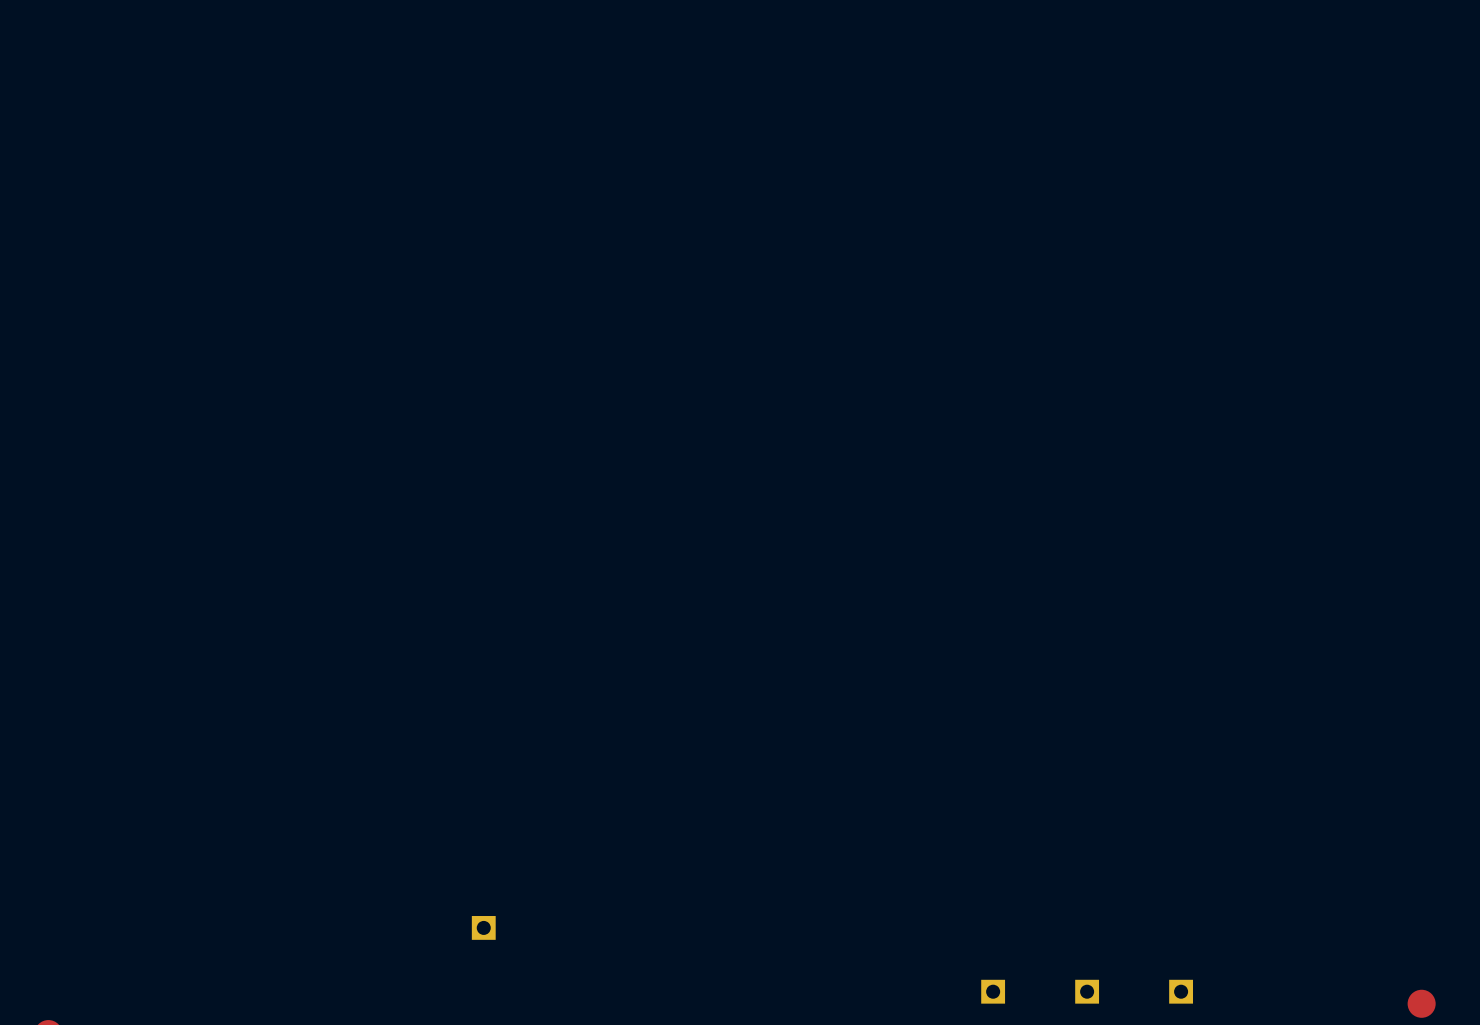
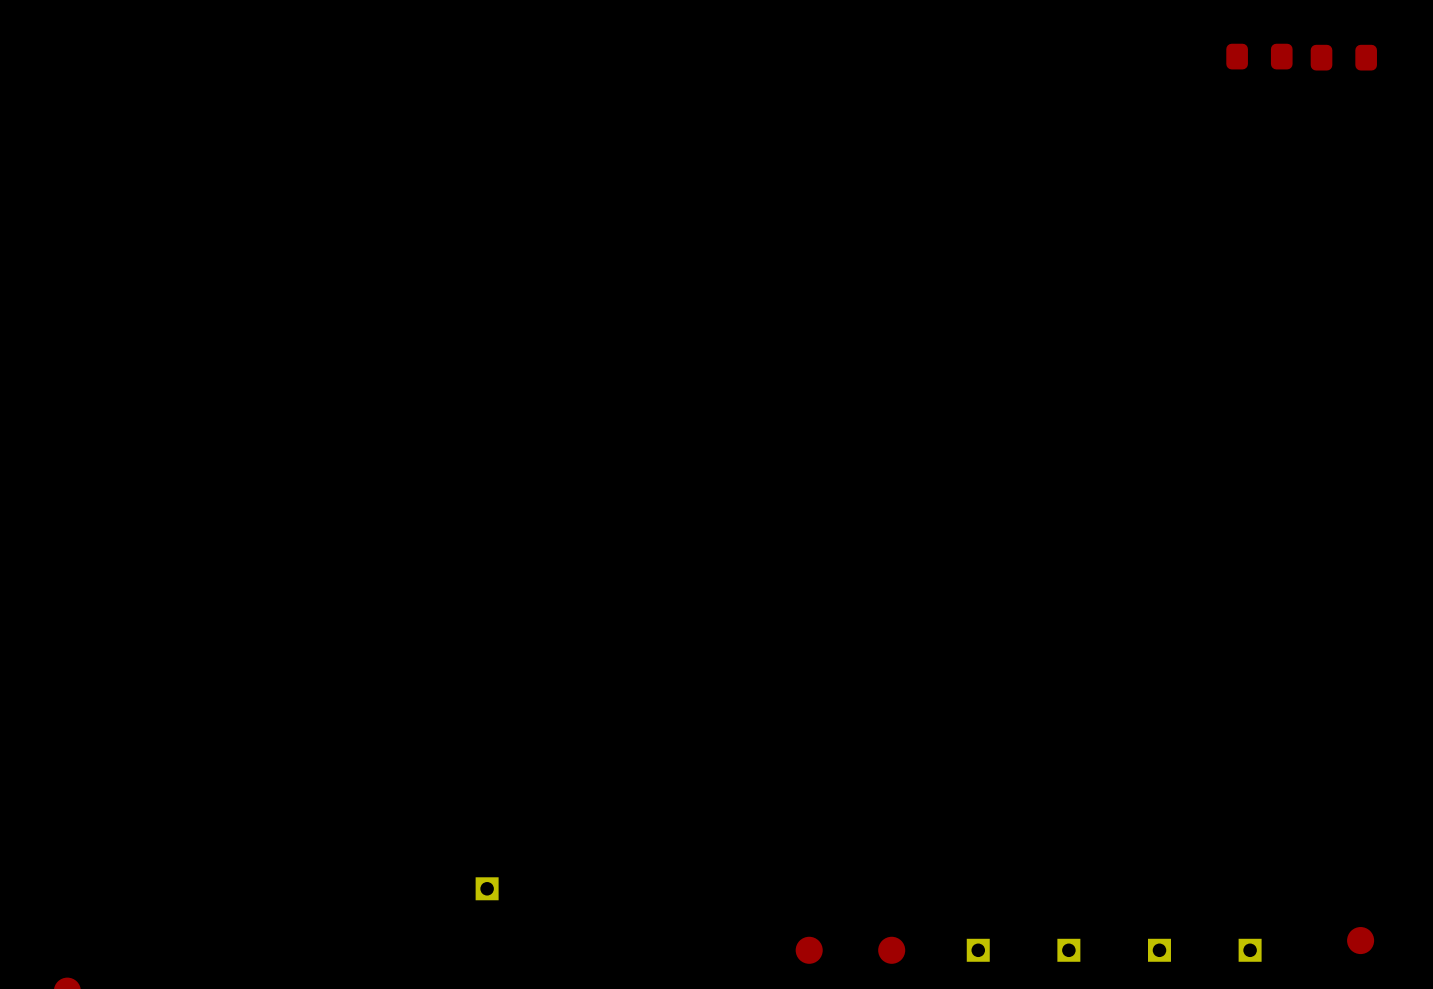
part: none -> (1259, 56)
part: none -> (1343, 57)
part: none -> (809, 950)
part: none -> (891, 950)
part: none -> (1250, 950)
part position: (1421, 1003) -> (1360, 940)

